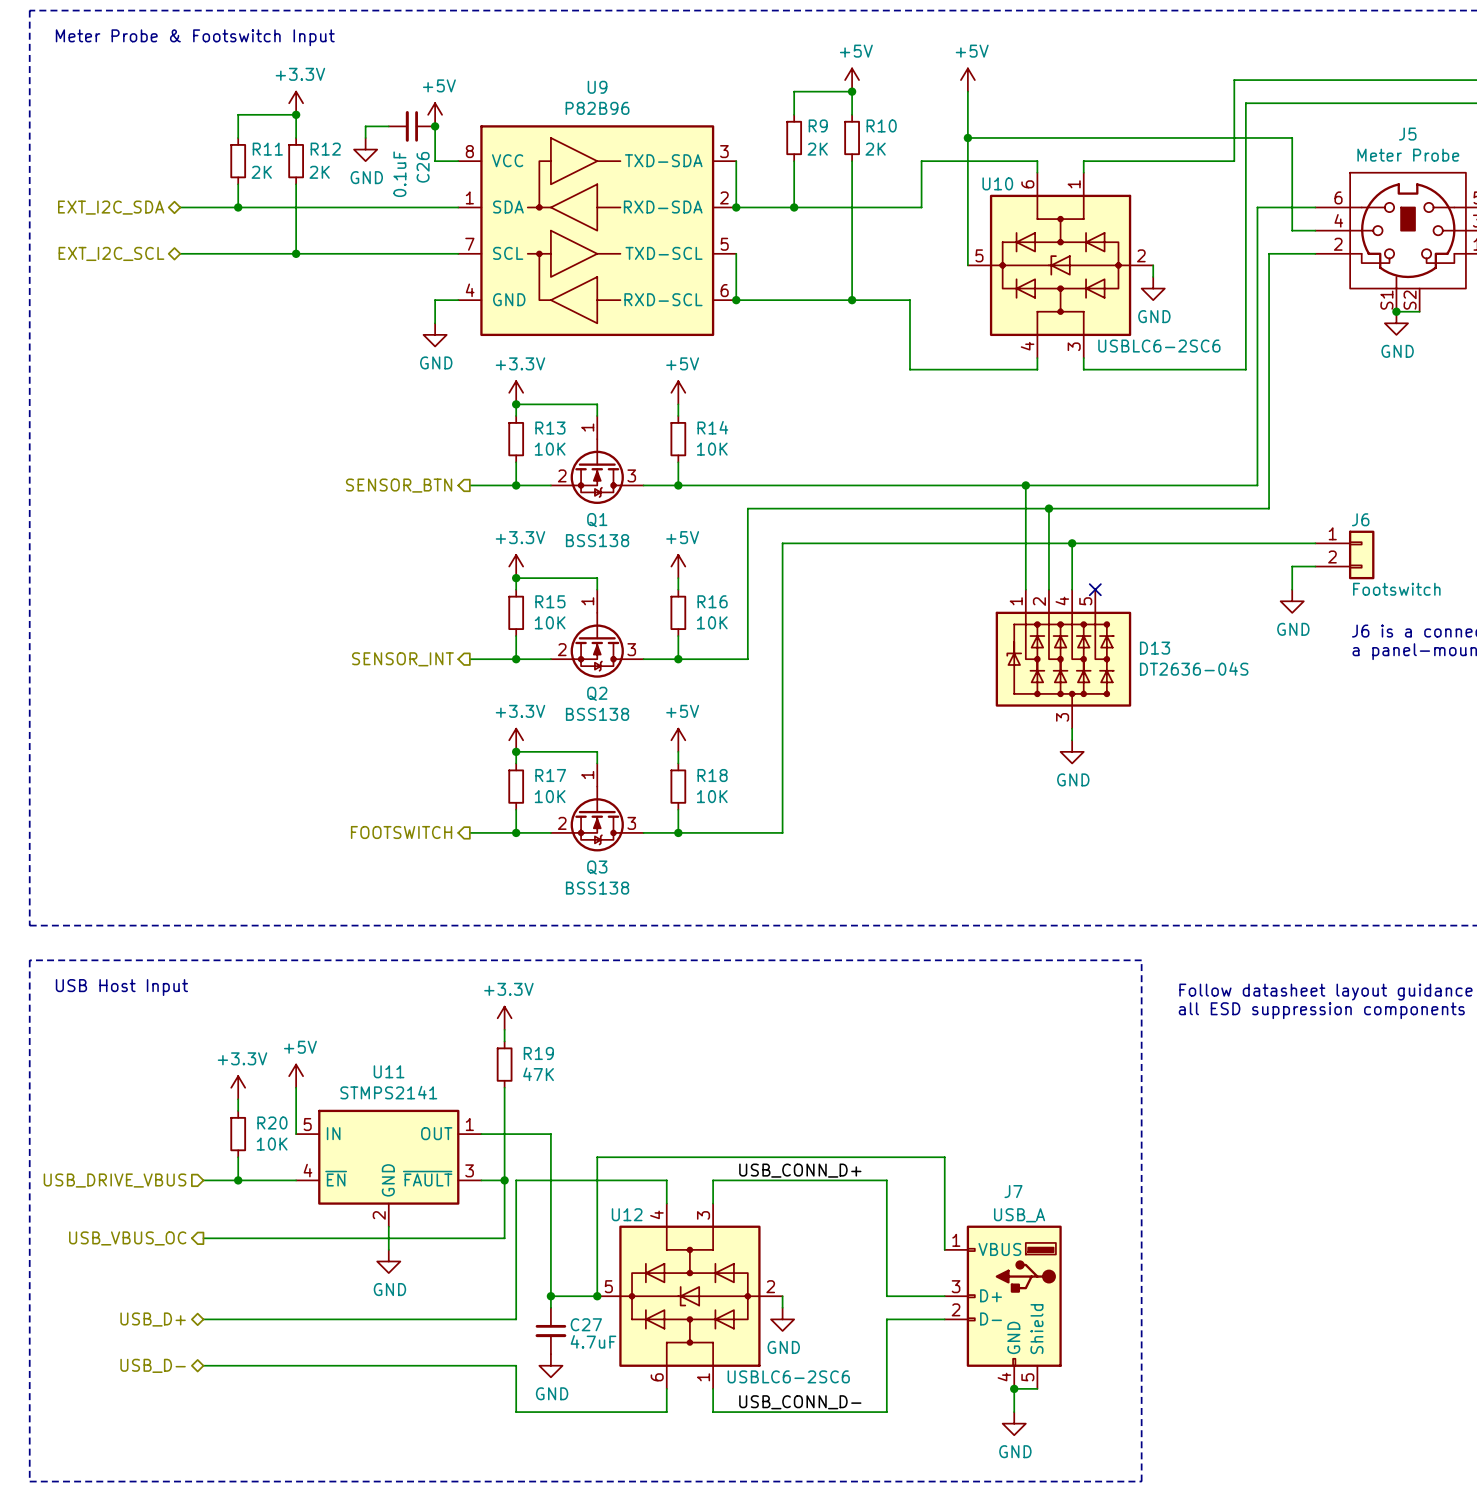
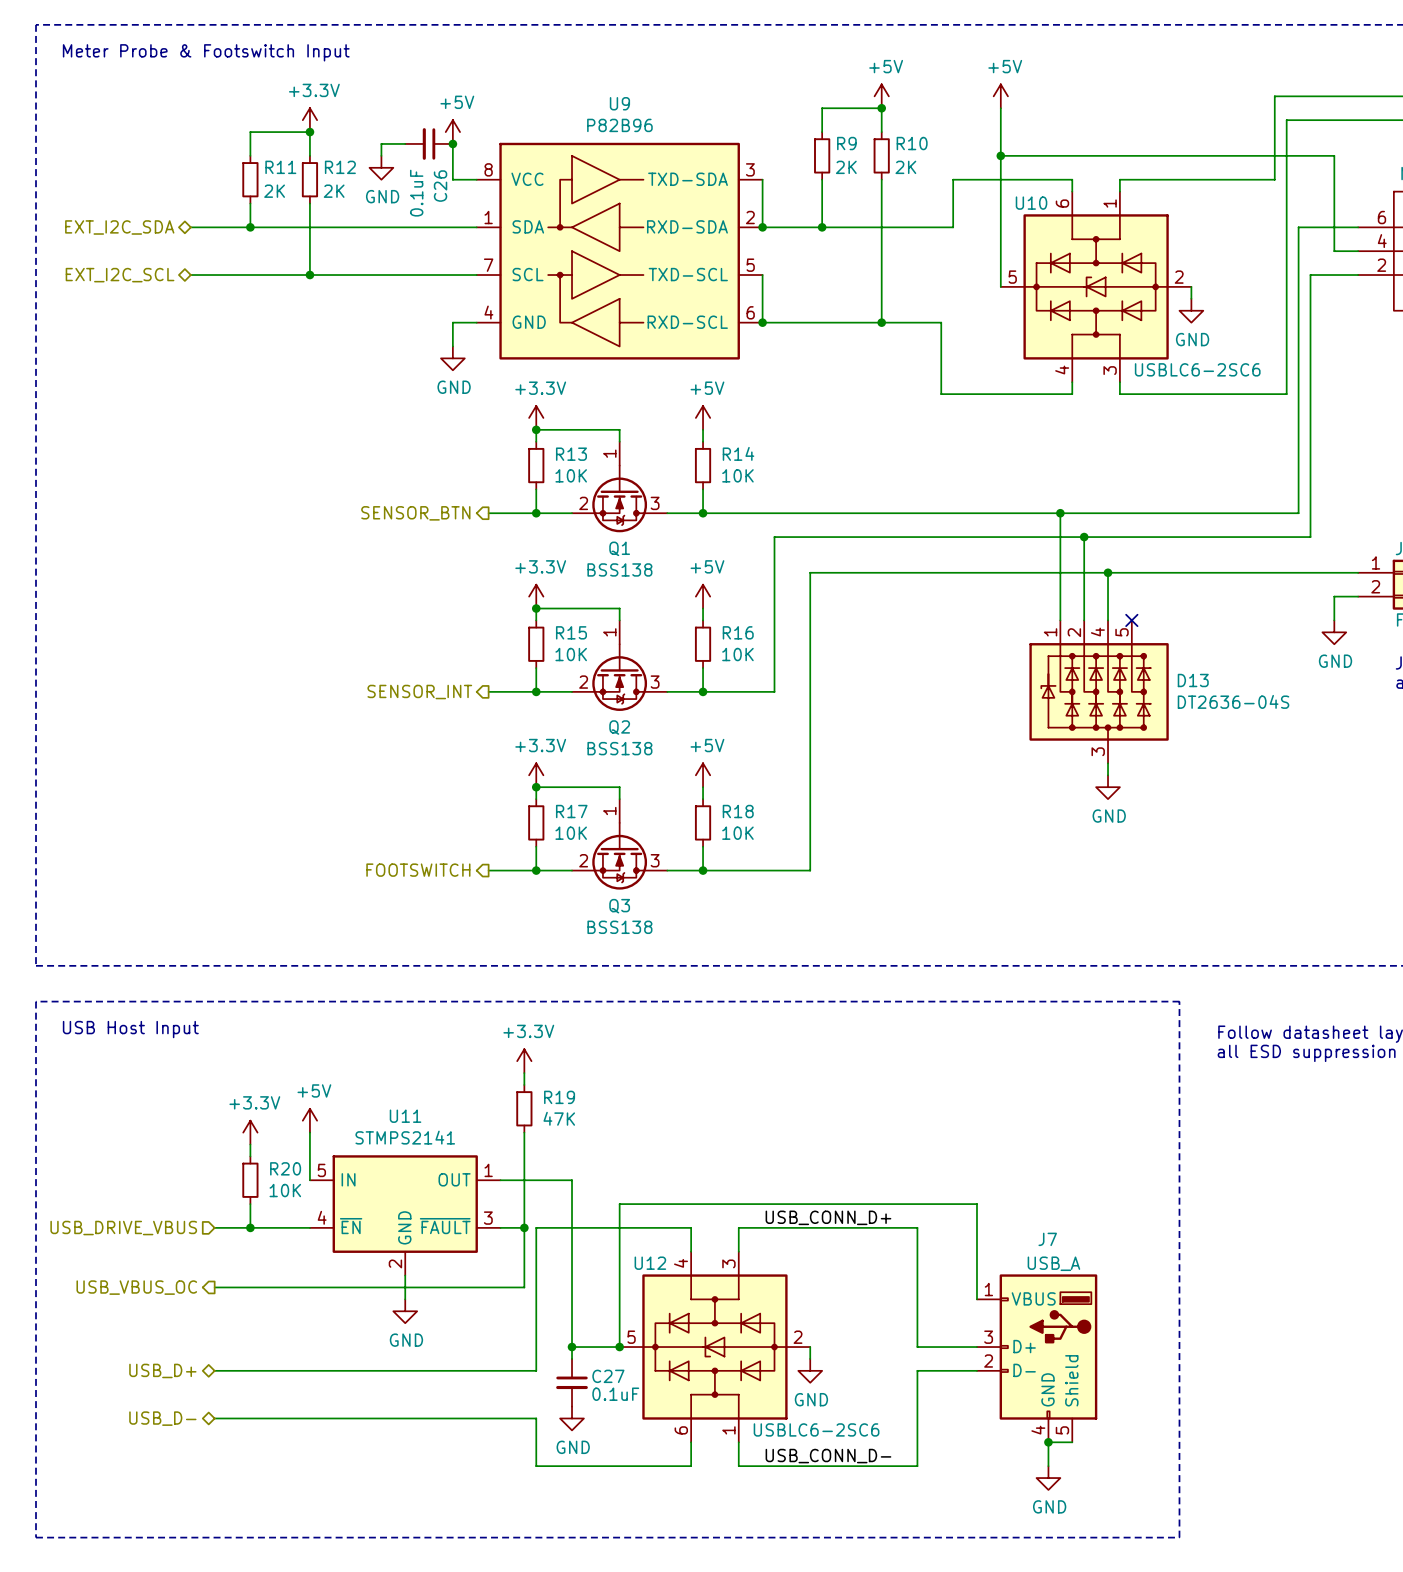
C27 value: 4.7uF (593, 1341) -> 0.1uF (615, 1394)

